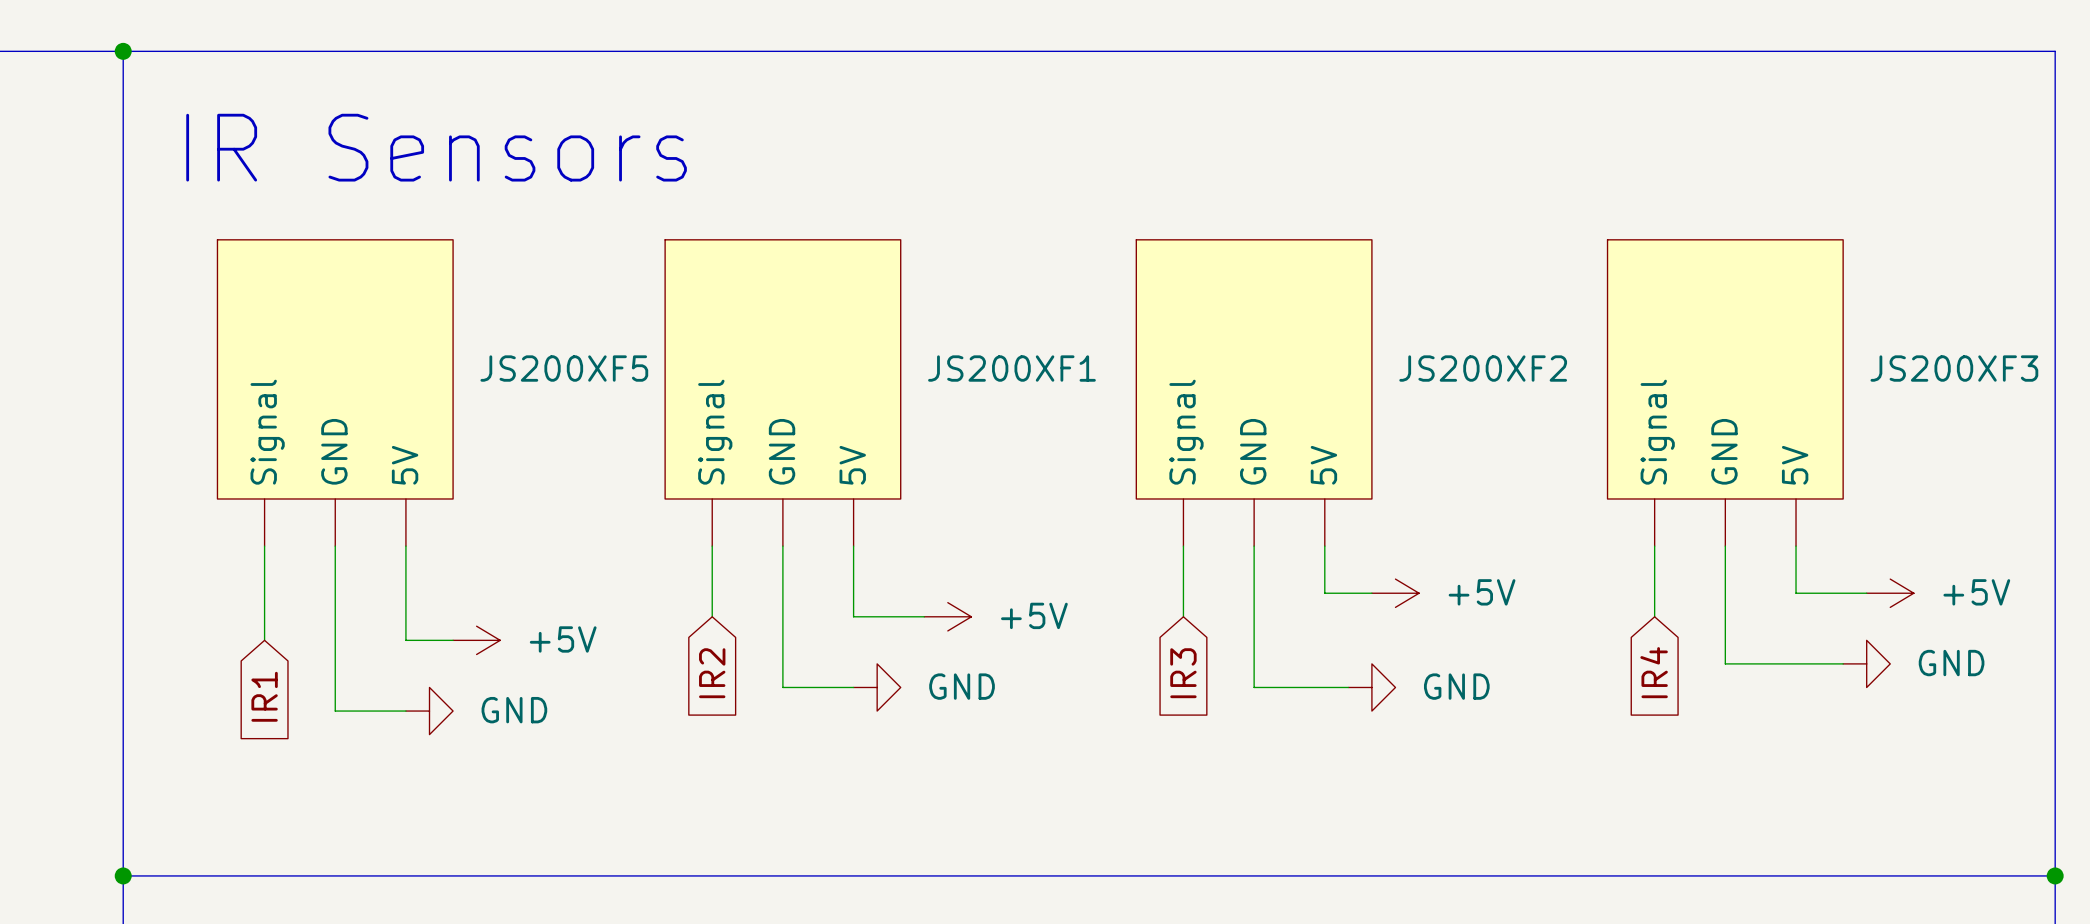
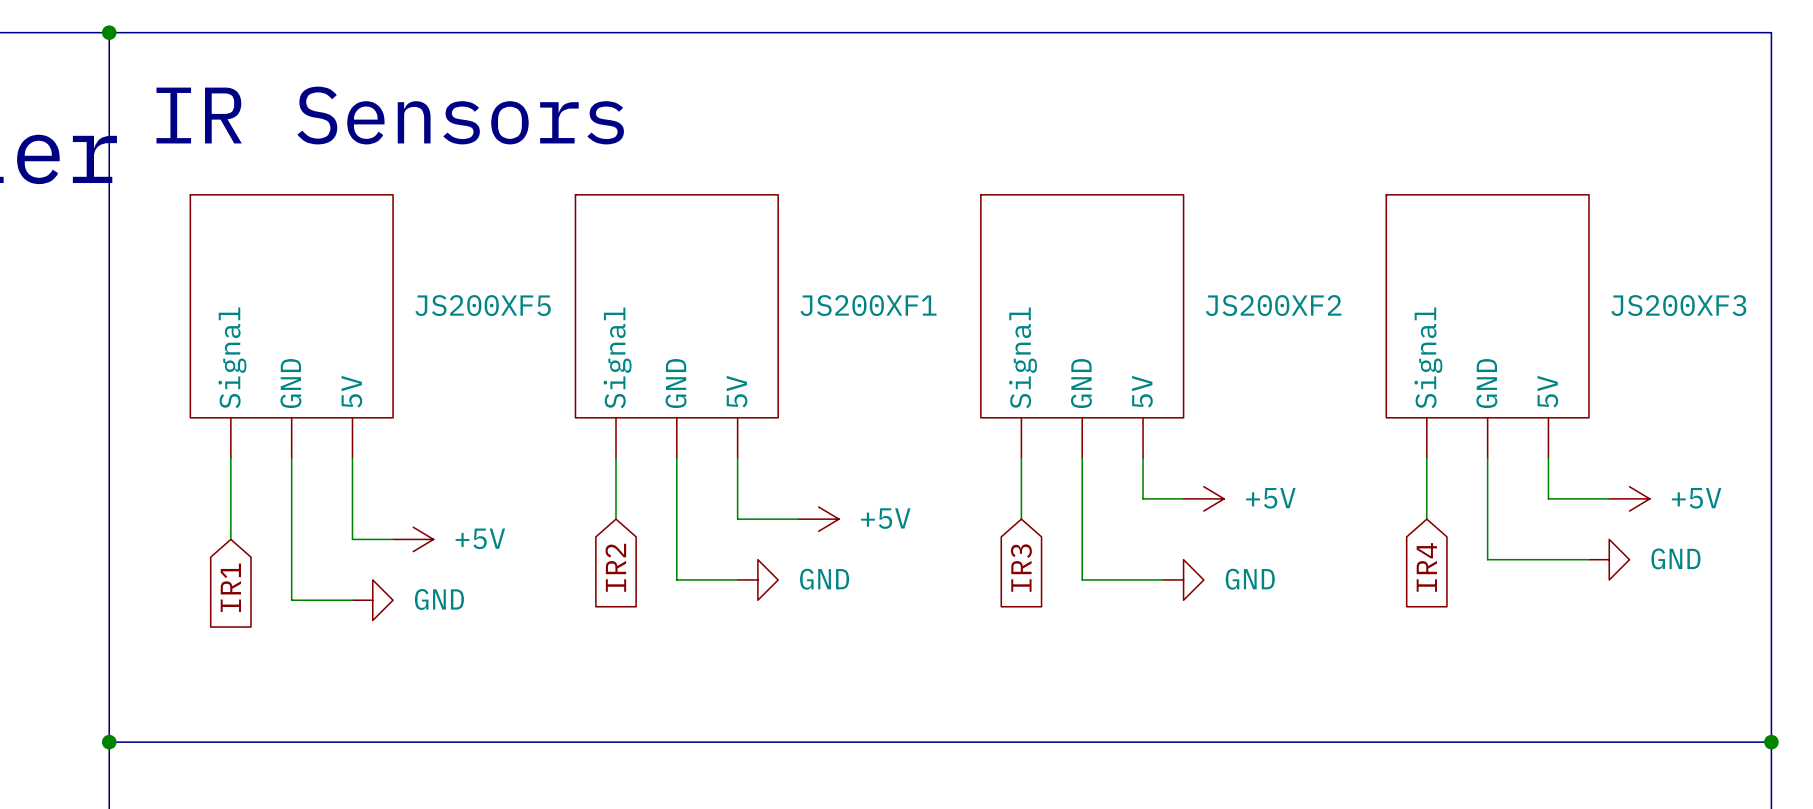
JS200XF5 symbol: [217, 239, 454, 547] -> [190, 194, 394, 459]
JS200XF1 symbol: [665, 239, 901, 547] -> [575, 194, 779, 459]
JS200XF2 symbol: [1136, 239, 1372, 547] -> [980, 194, 1184, 459]
JS200XF3 symbol: [1607, 239, 1844, 547] -> [1386, 194, 1589, 459]

